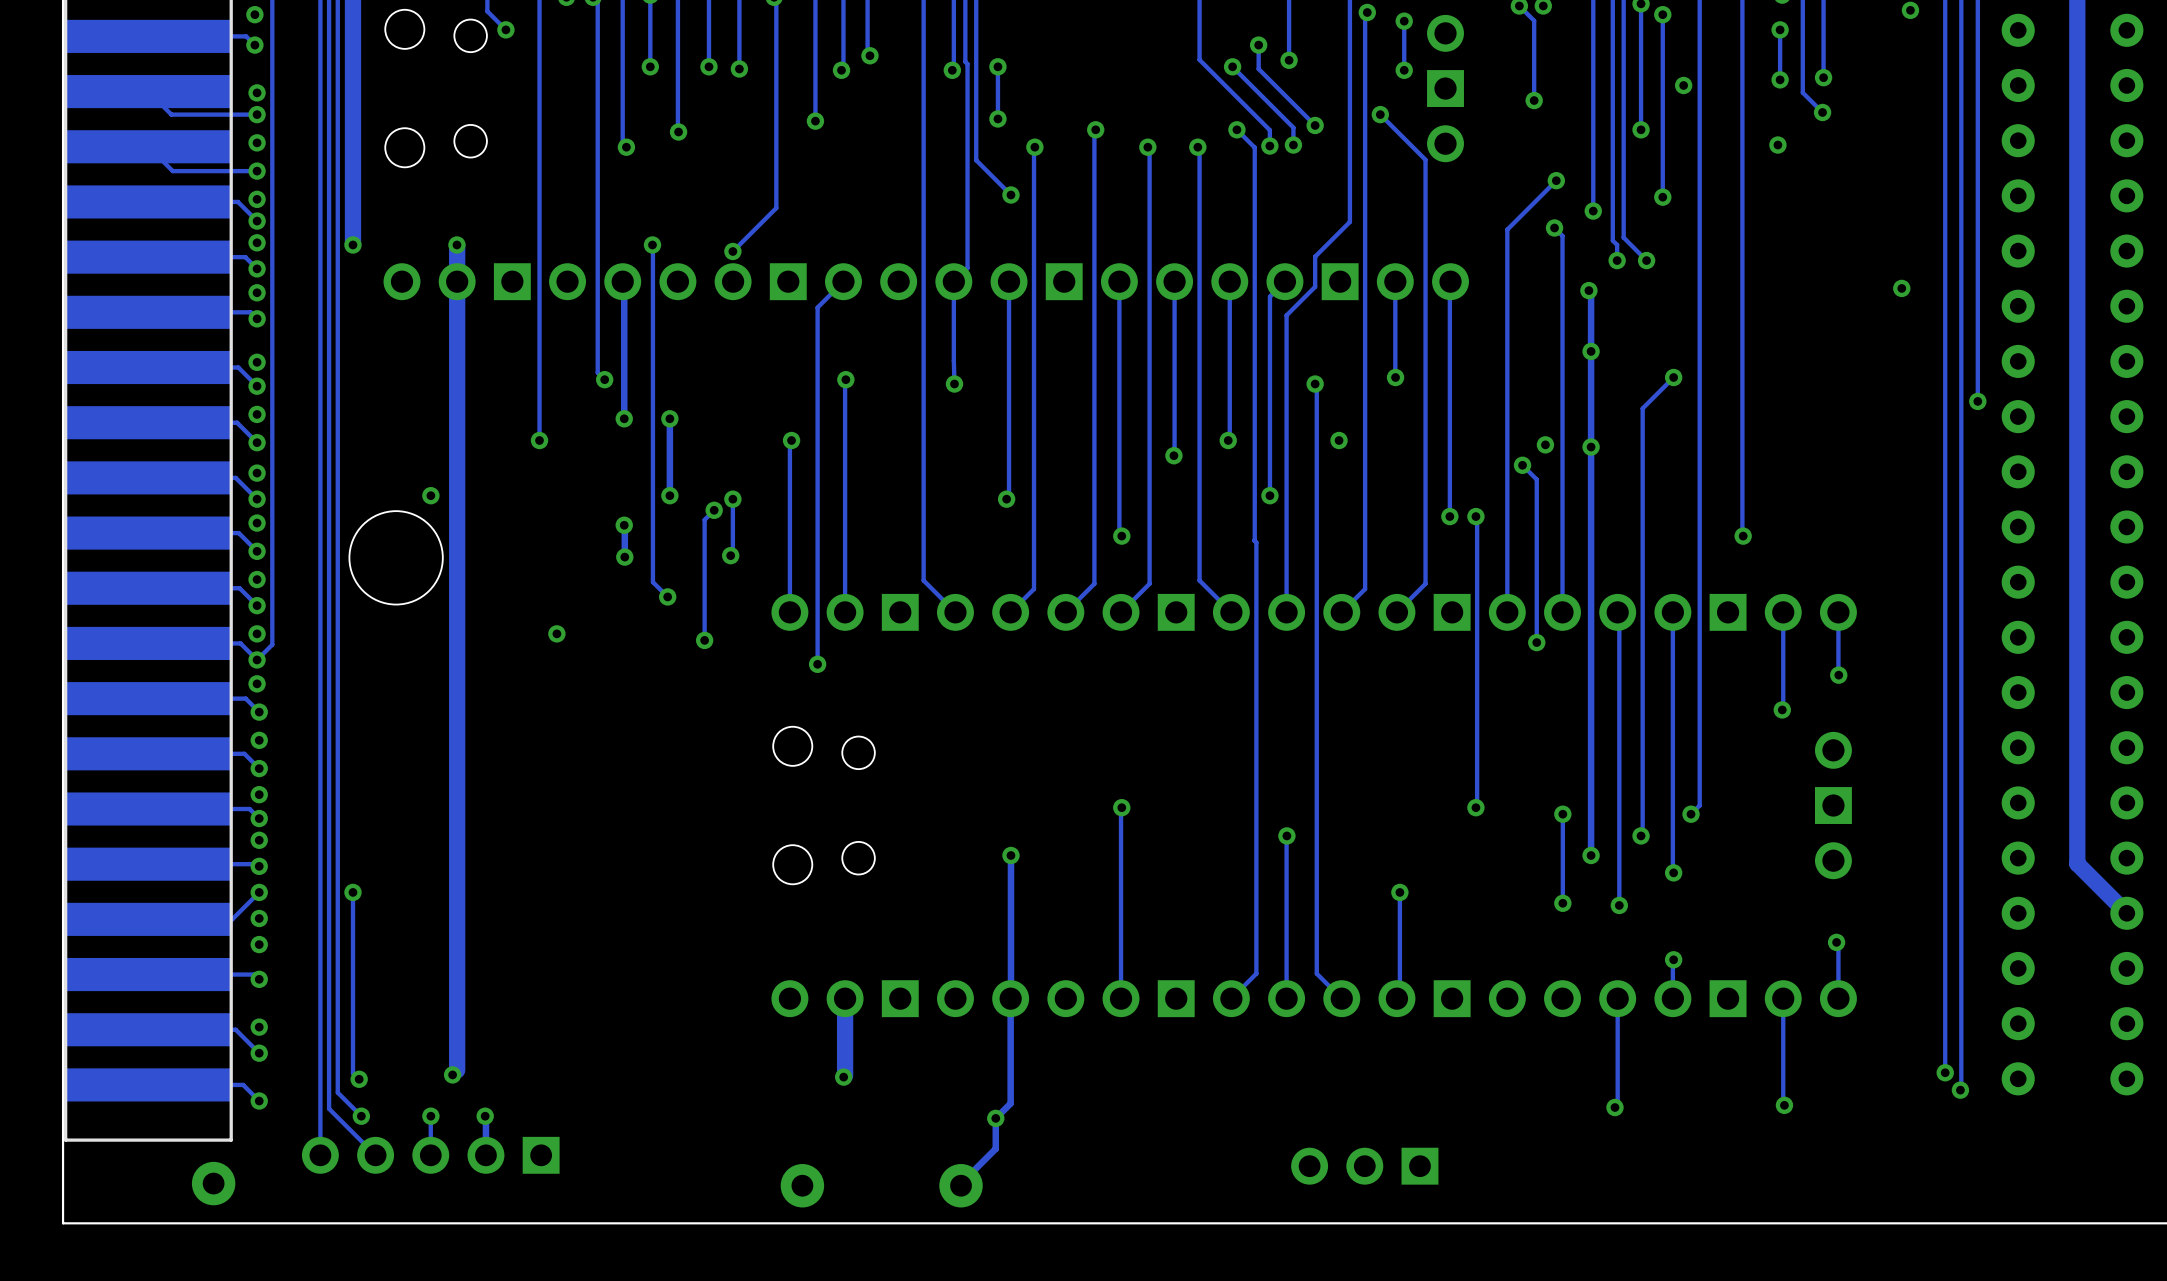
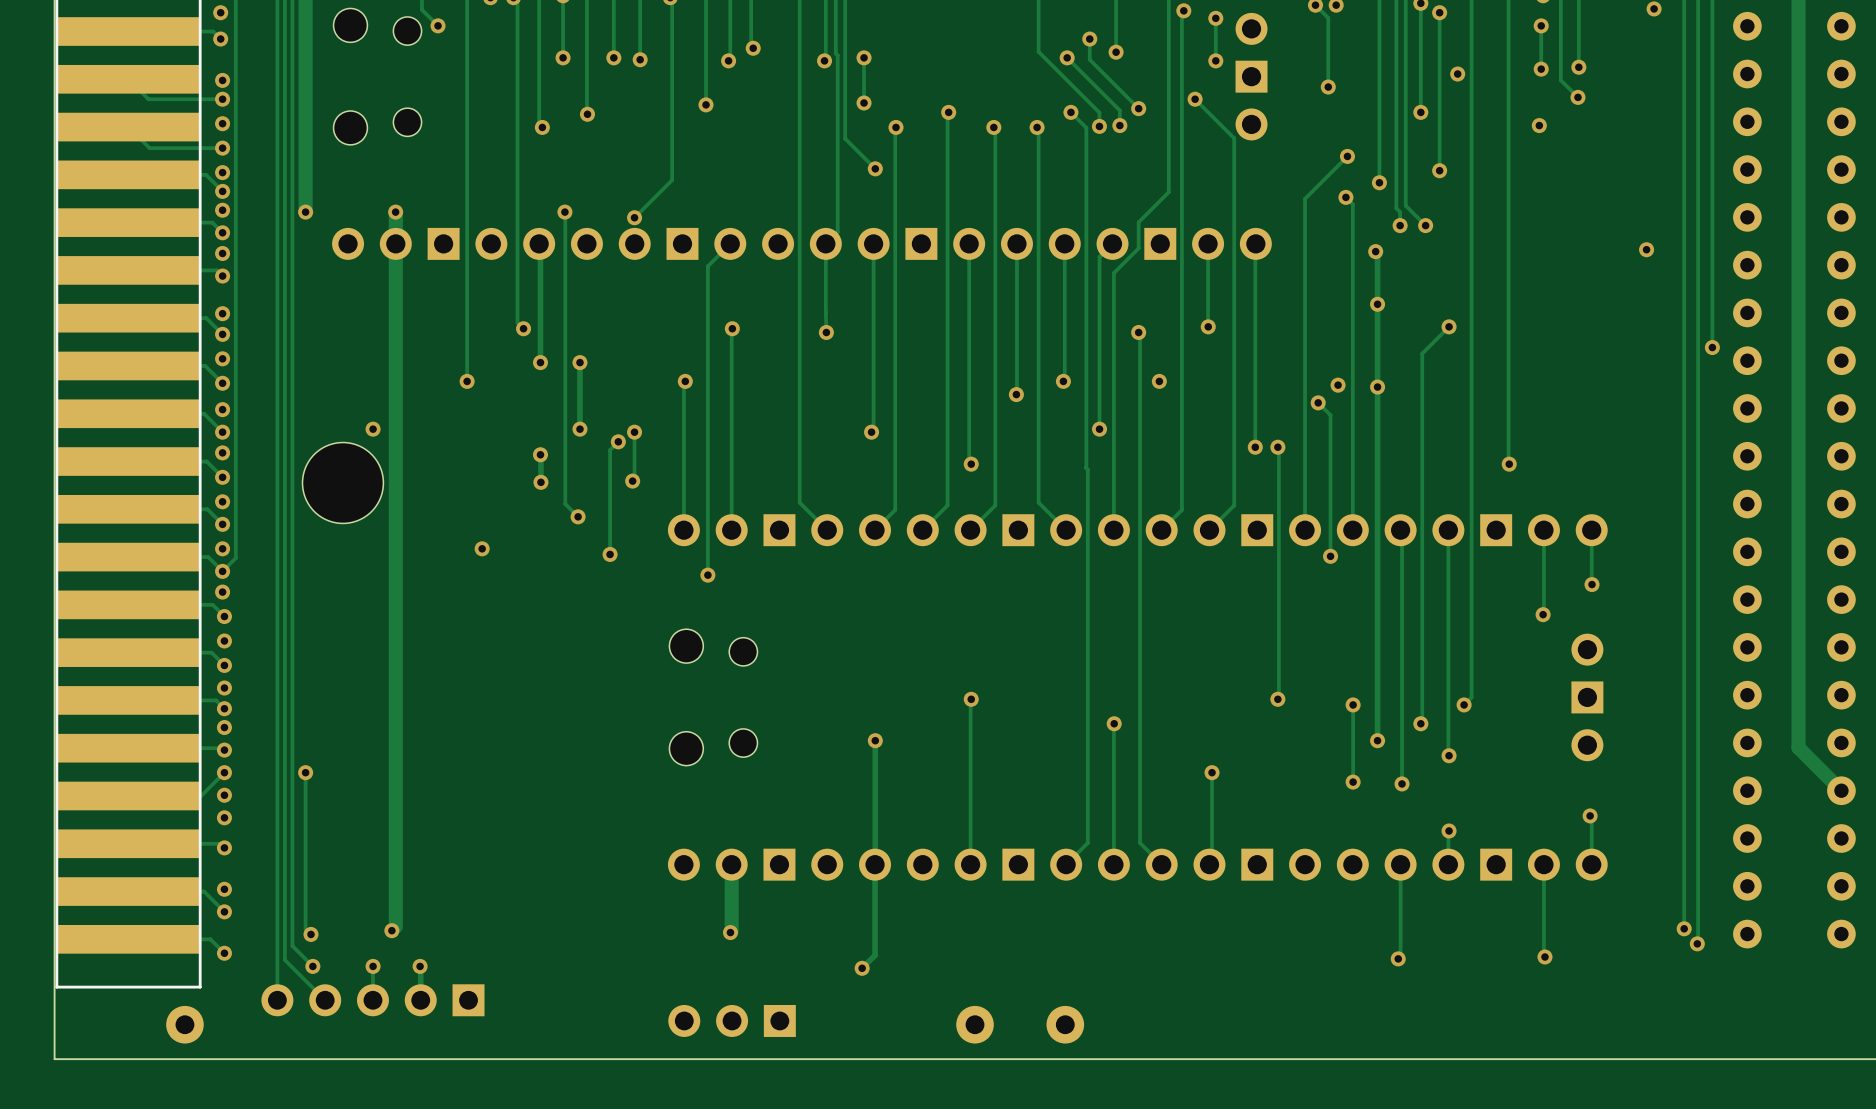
track: (995, 1118) (995, 1148) (961, 1183) -> none
part position: (1364, 1166) -> (732, 1020)
part: none -> (975, 1024)
part: none -> (1065, 1024)
part: (802, 1185) -> none
part: (961, 1185) -> none

